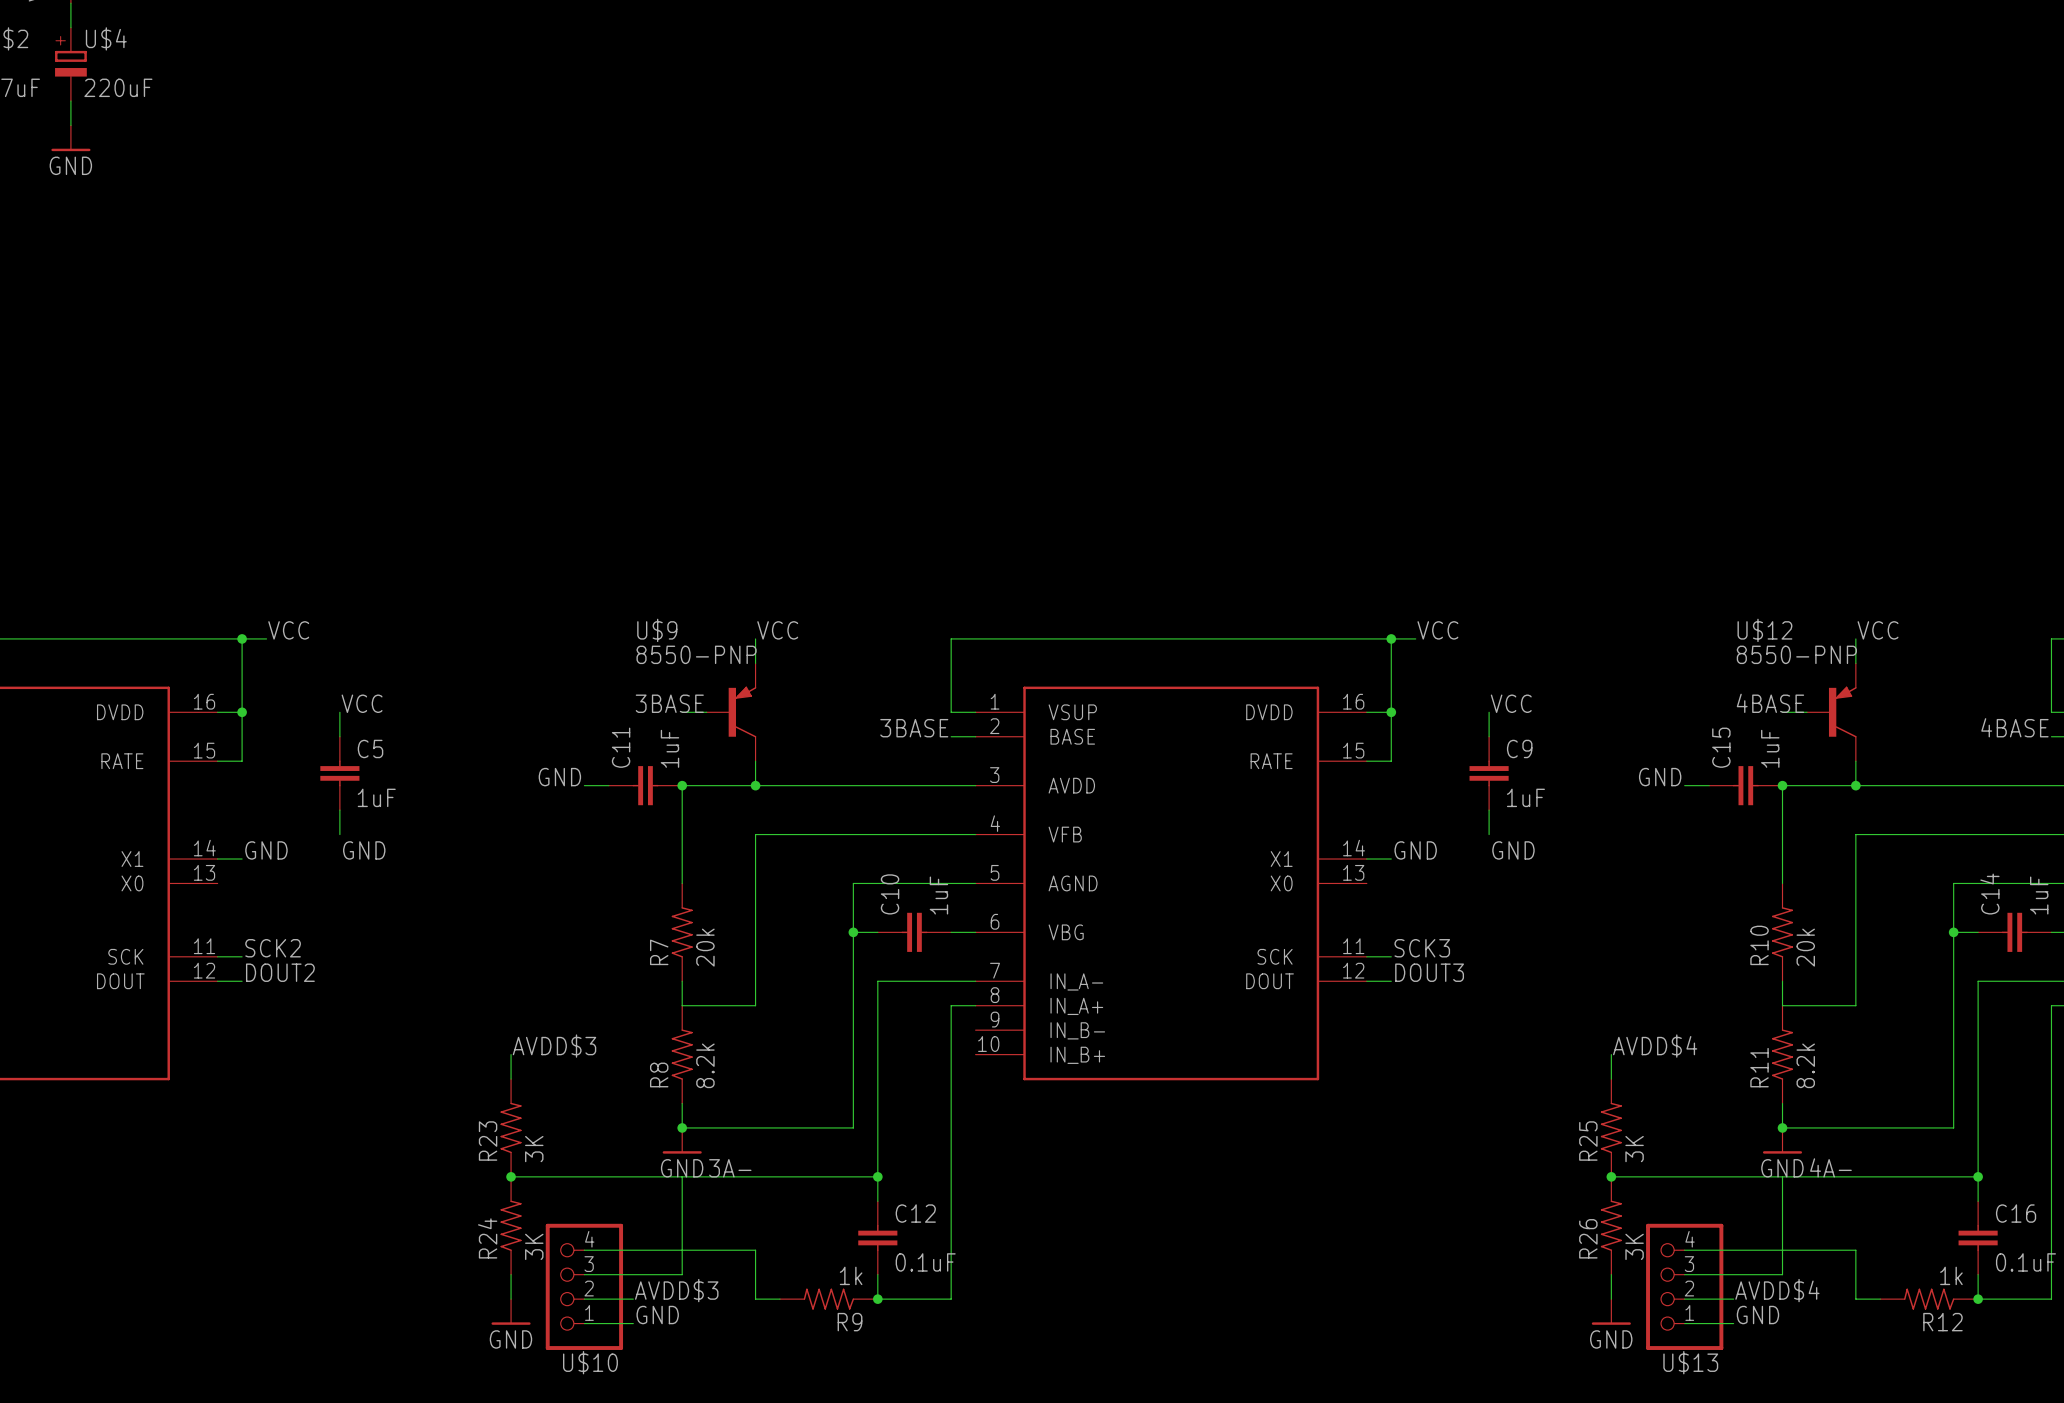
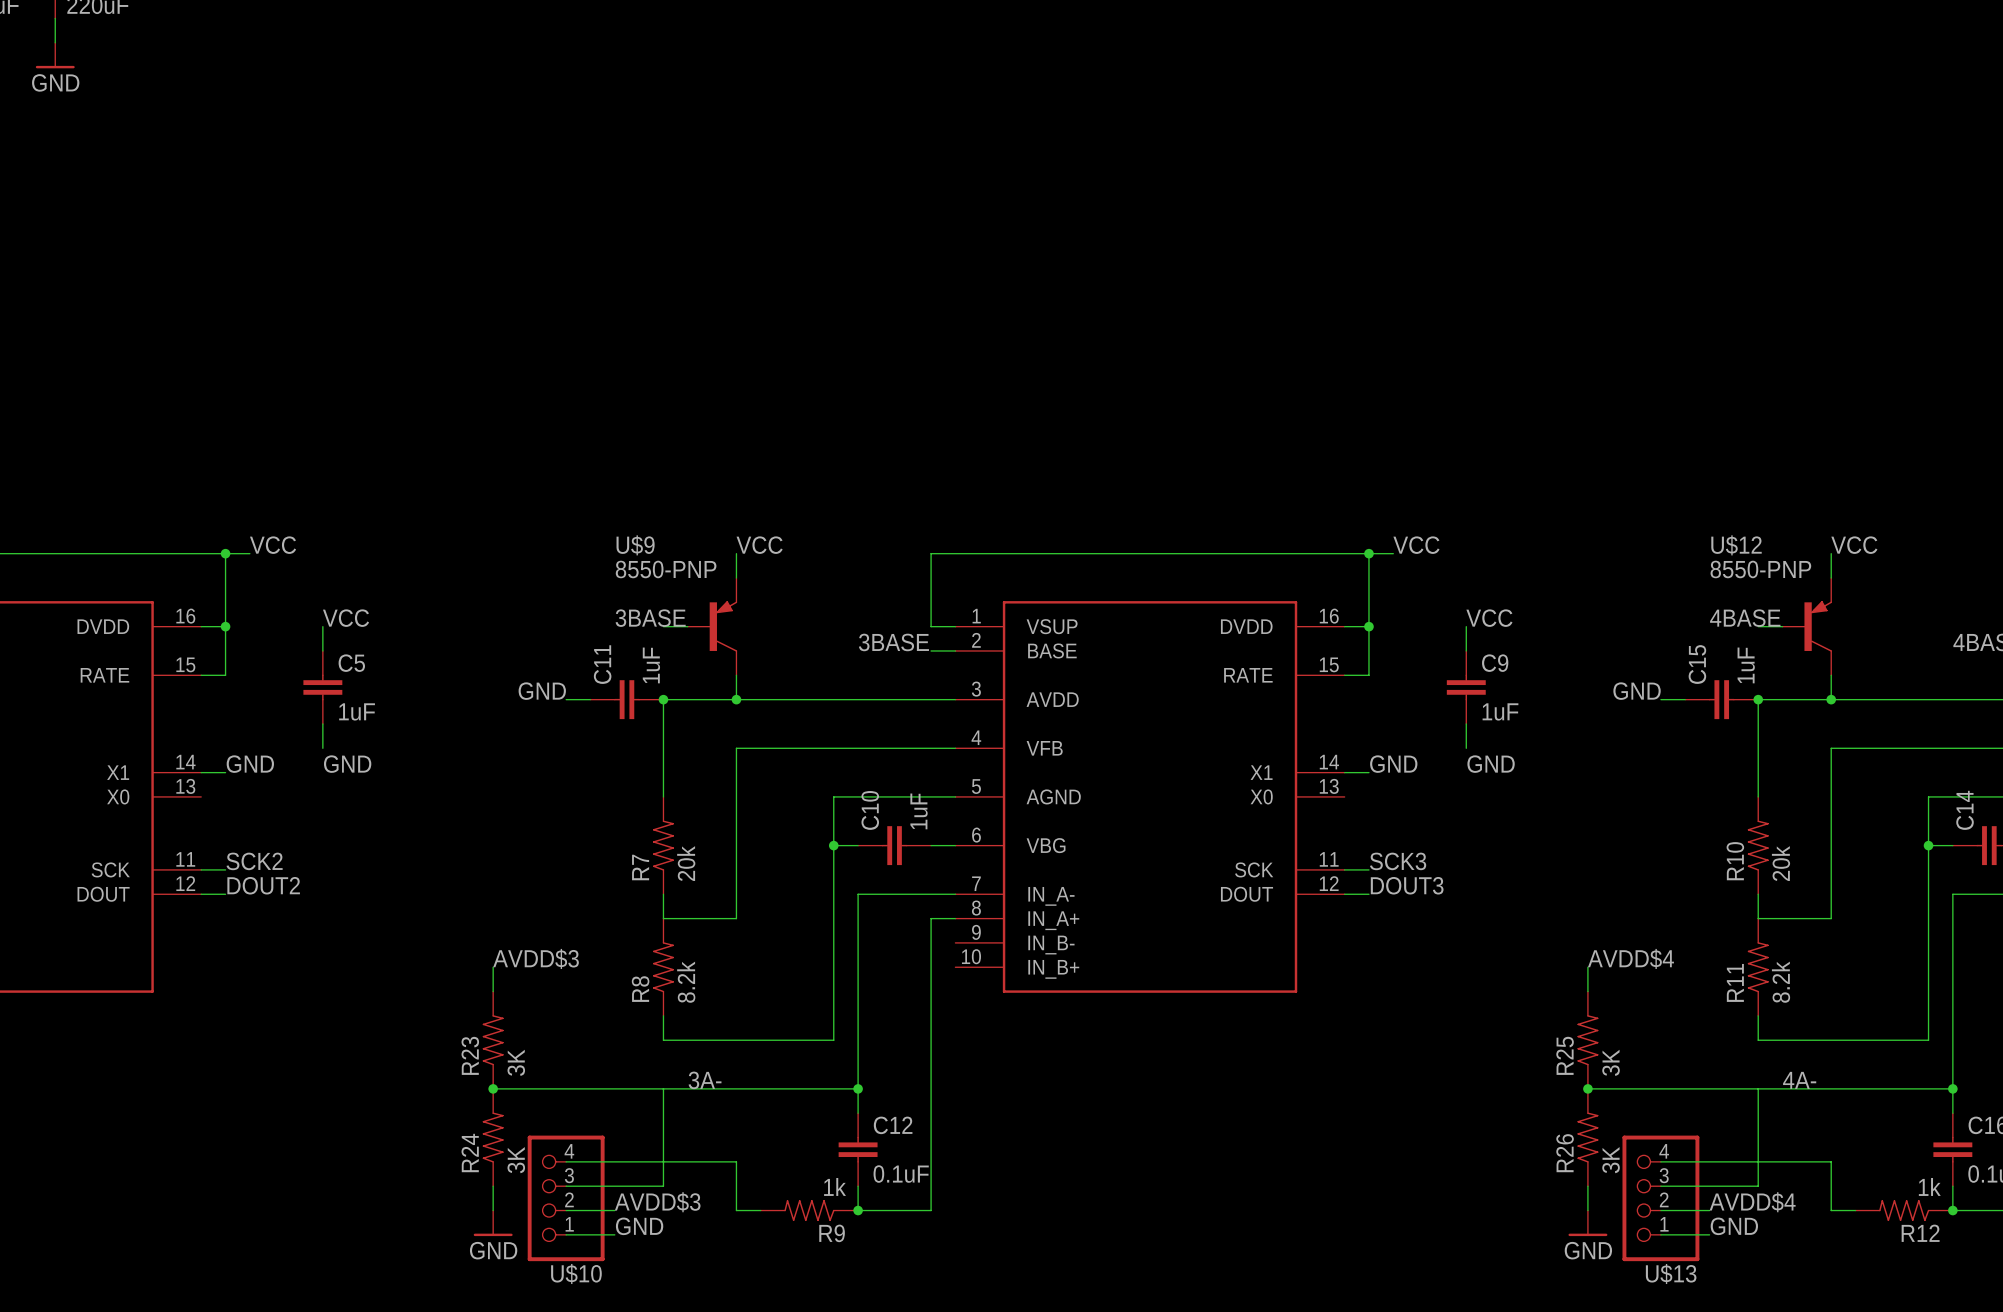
junction: (682, 1127) -> none
junction: (1782, 1127) -> none
power symbol: GND (682, 1140) -> none
power symbol: GND (1782, 1140) -> none

